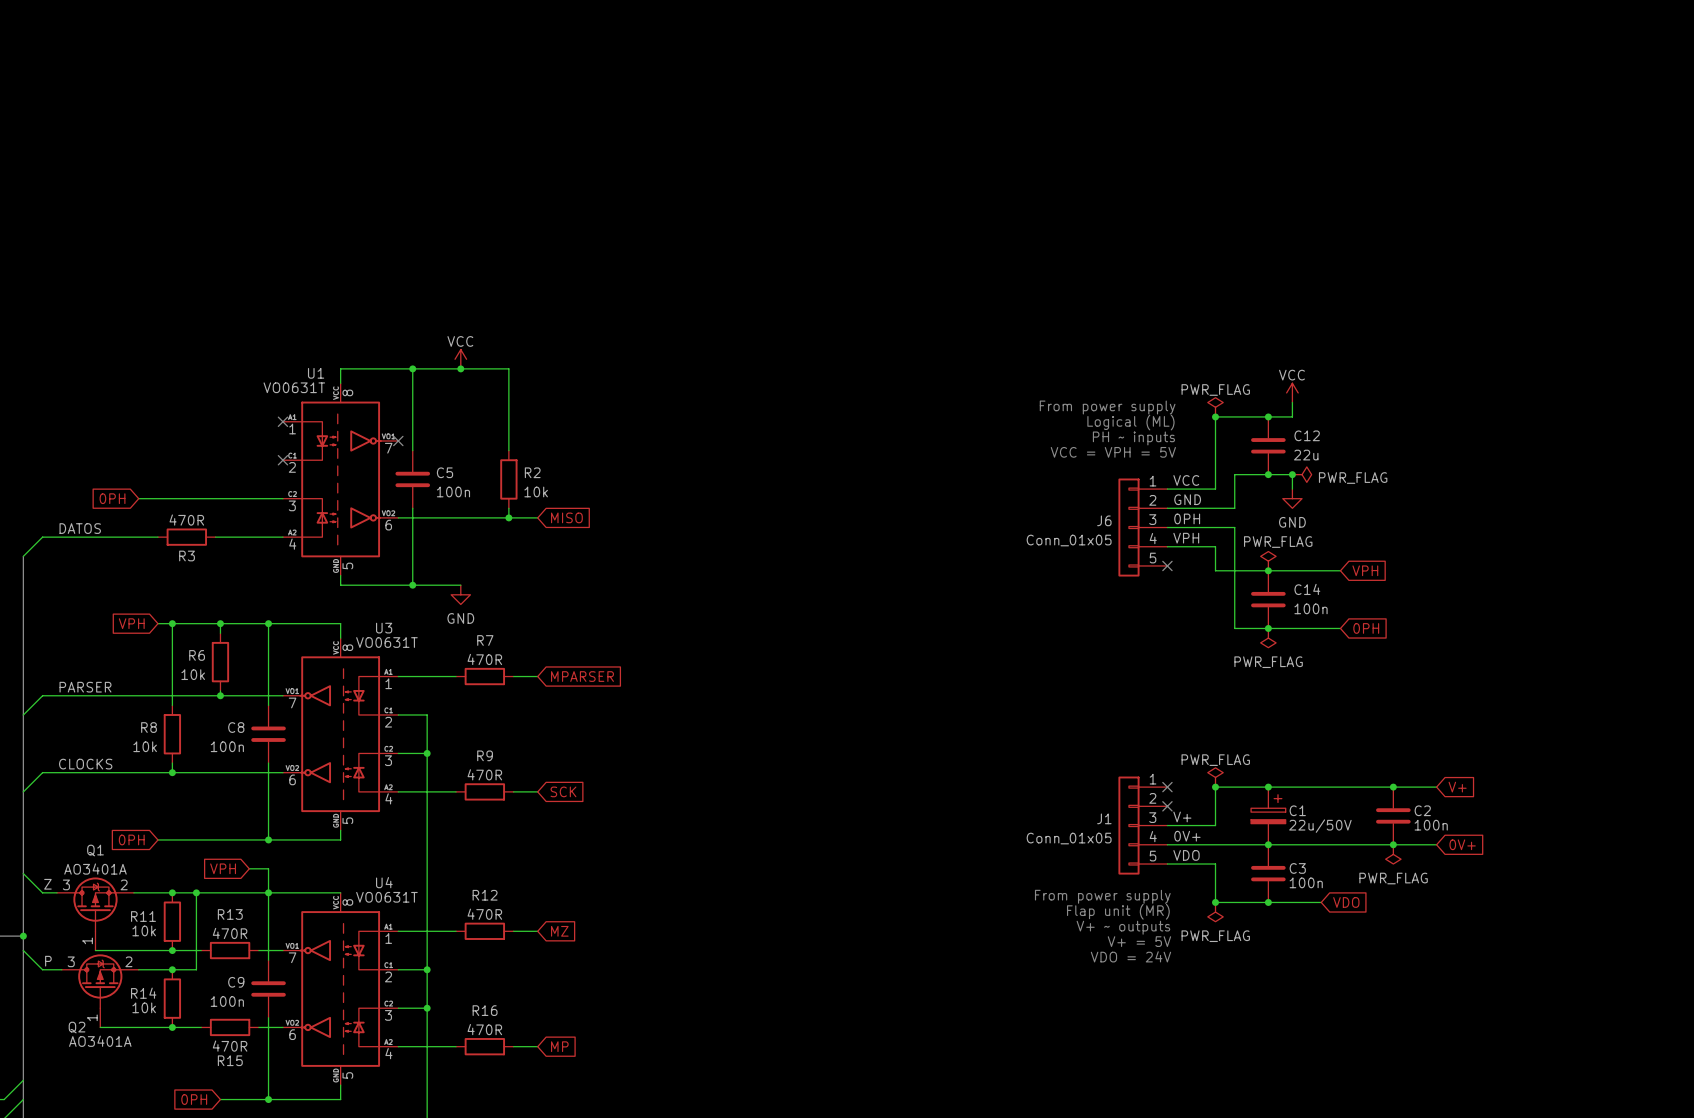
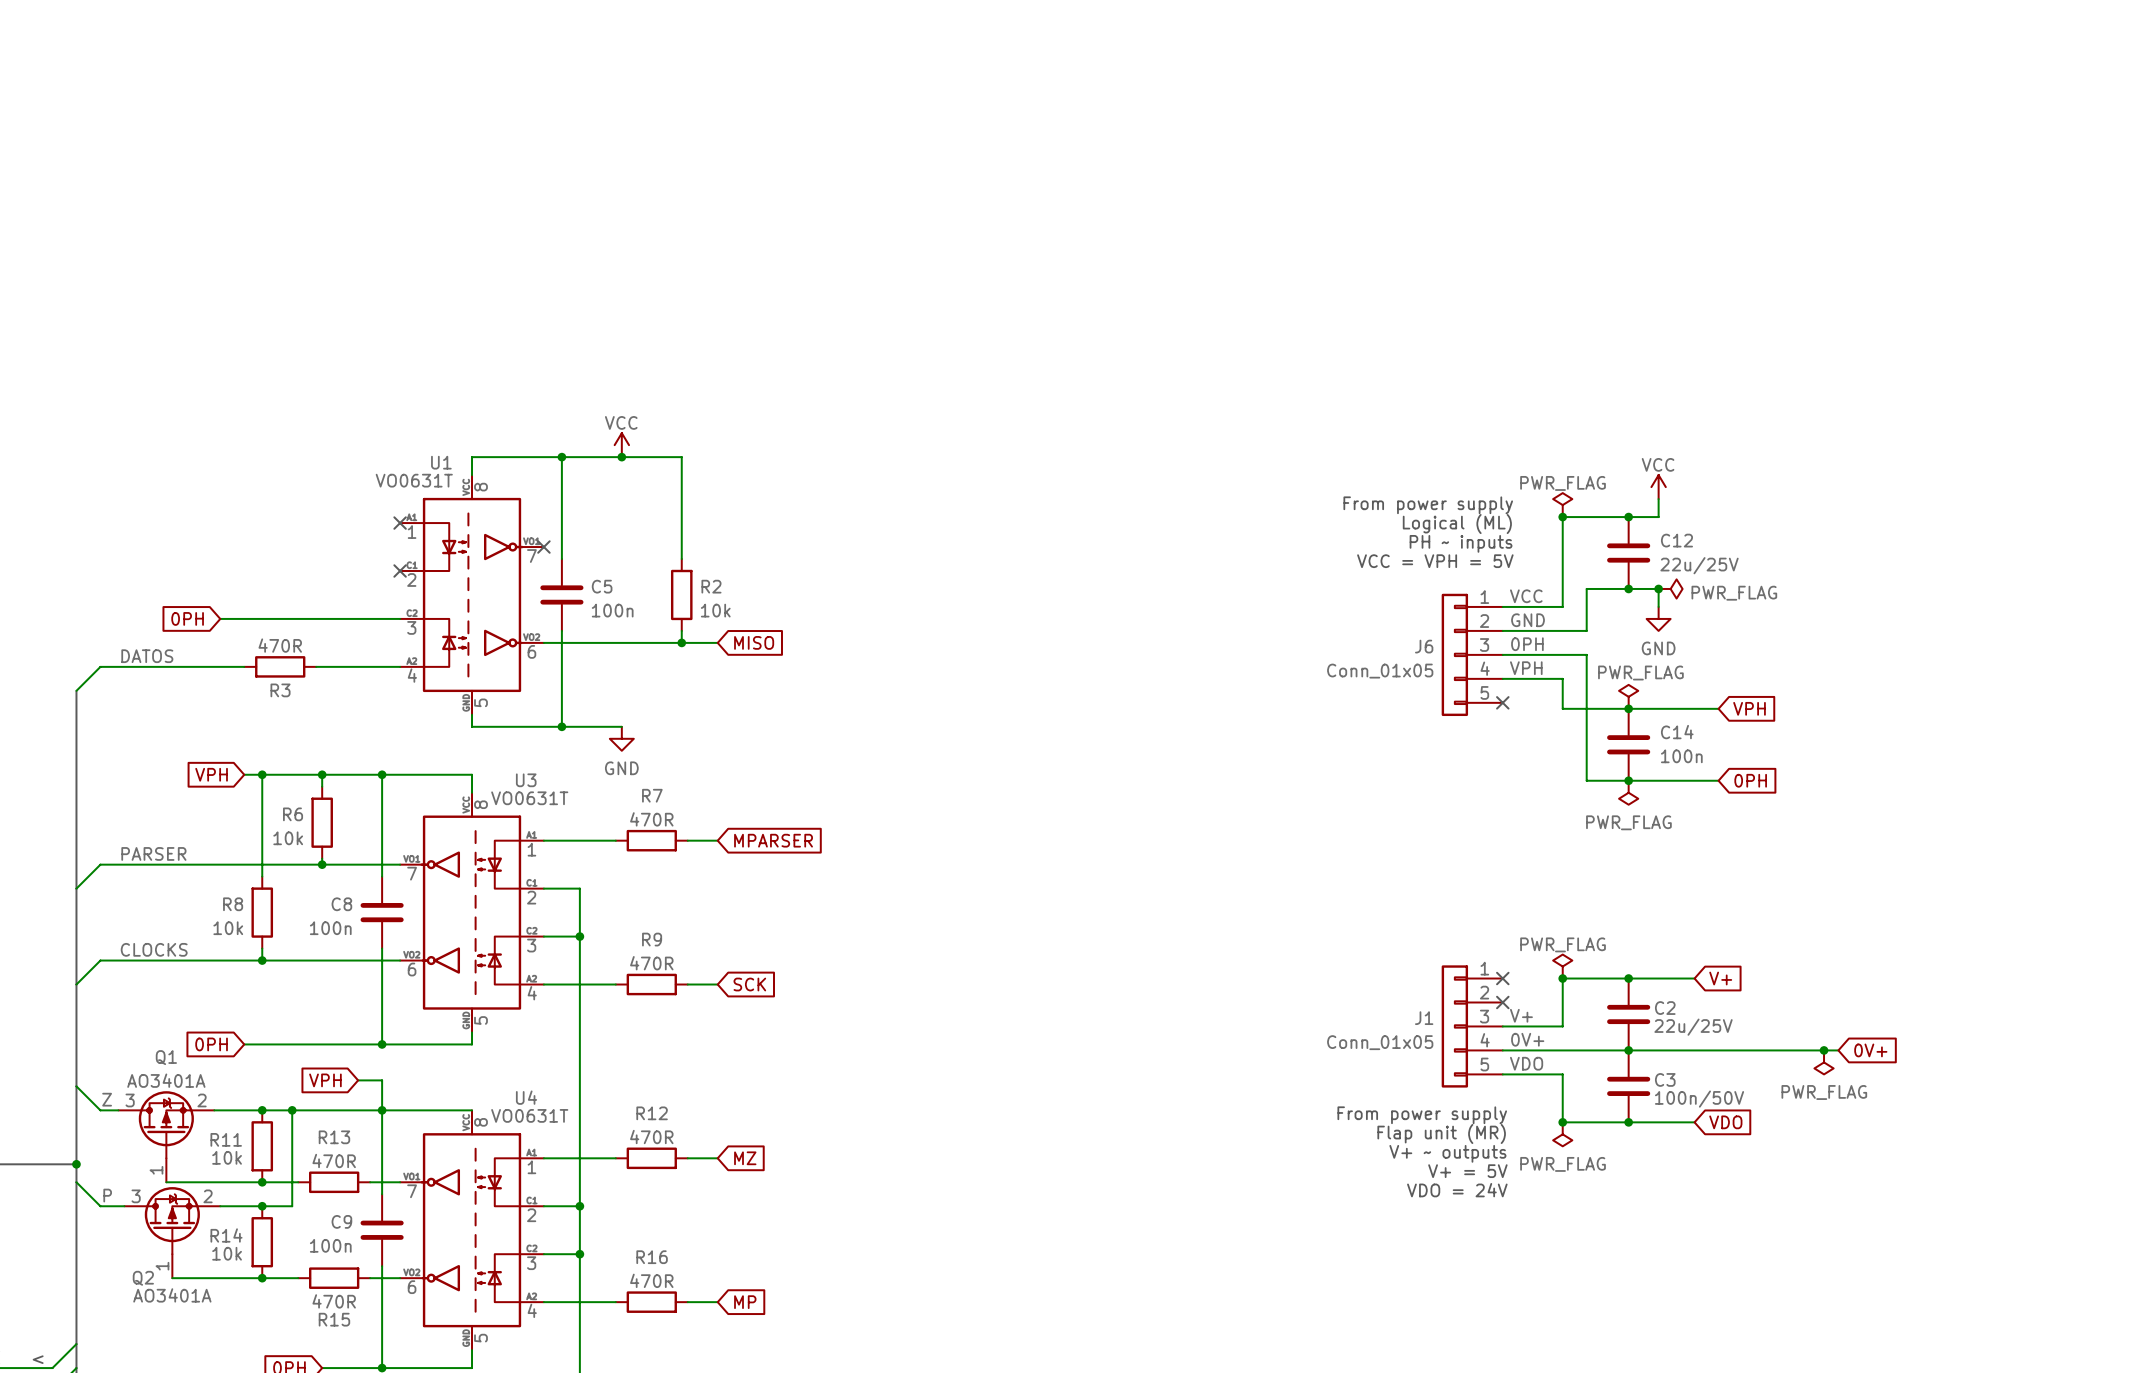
C12 value: 22u (1306, 455) -> 22u/25V (1699, 565)
wire: (1321, 787) (1436, 787) -> none
junction: (1393, 787) -> none
global label position: V+ (1457, 787) -> V+ (1720, 978)
C1: 22u/50V (1268, 815) -> none
C2 position: (1393, 815) -> (1628, 1014)
C2 value: 100n (1431, 825) -> 22u/25V (1693, 1027)
junction position: (1393, 844) -> (1824, 1050)
power symbol position: PWR_FLAG (1393, 854) -> PWR_FLAG (1824, 1062)
C3 value: 100n (1306, 882) -> 100n/50V (1699, 1099)

